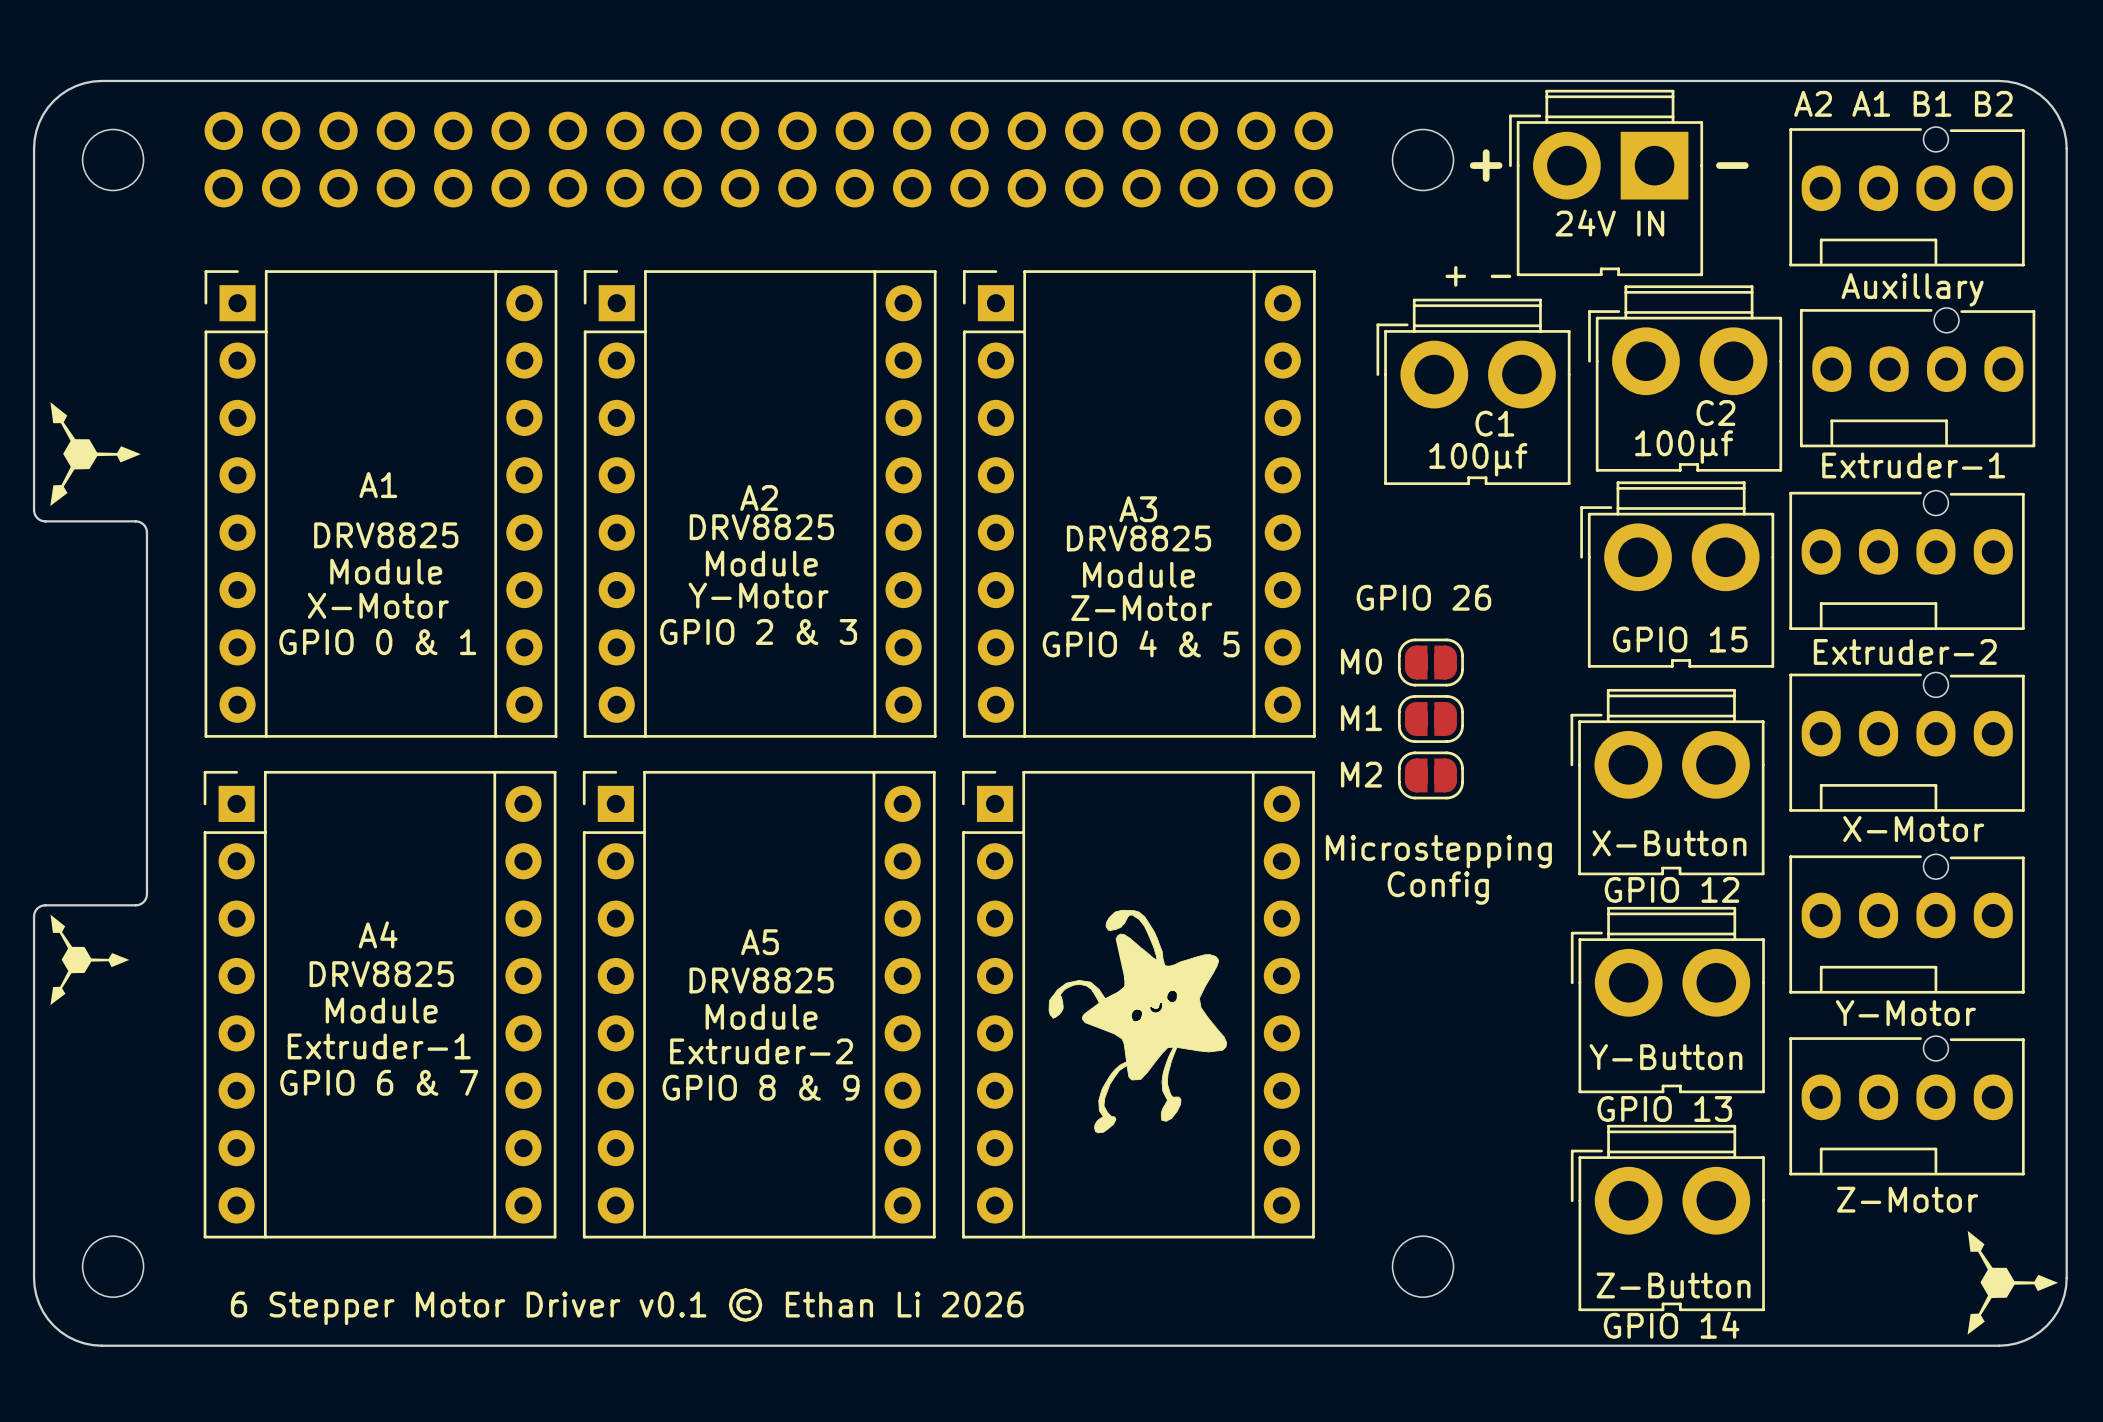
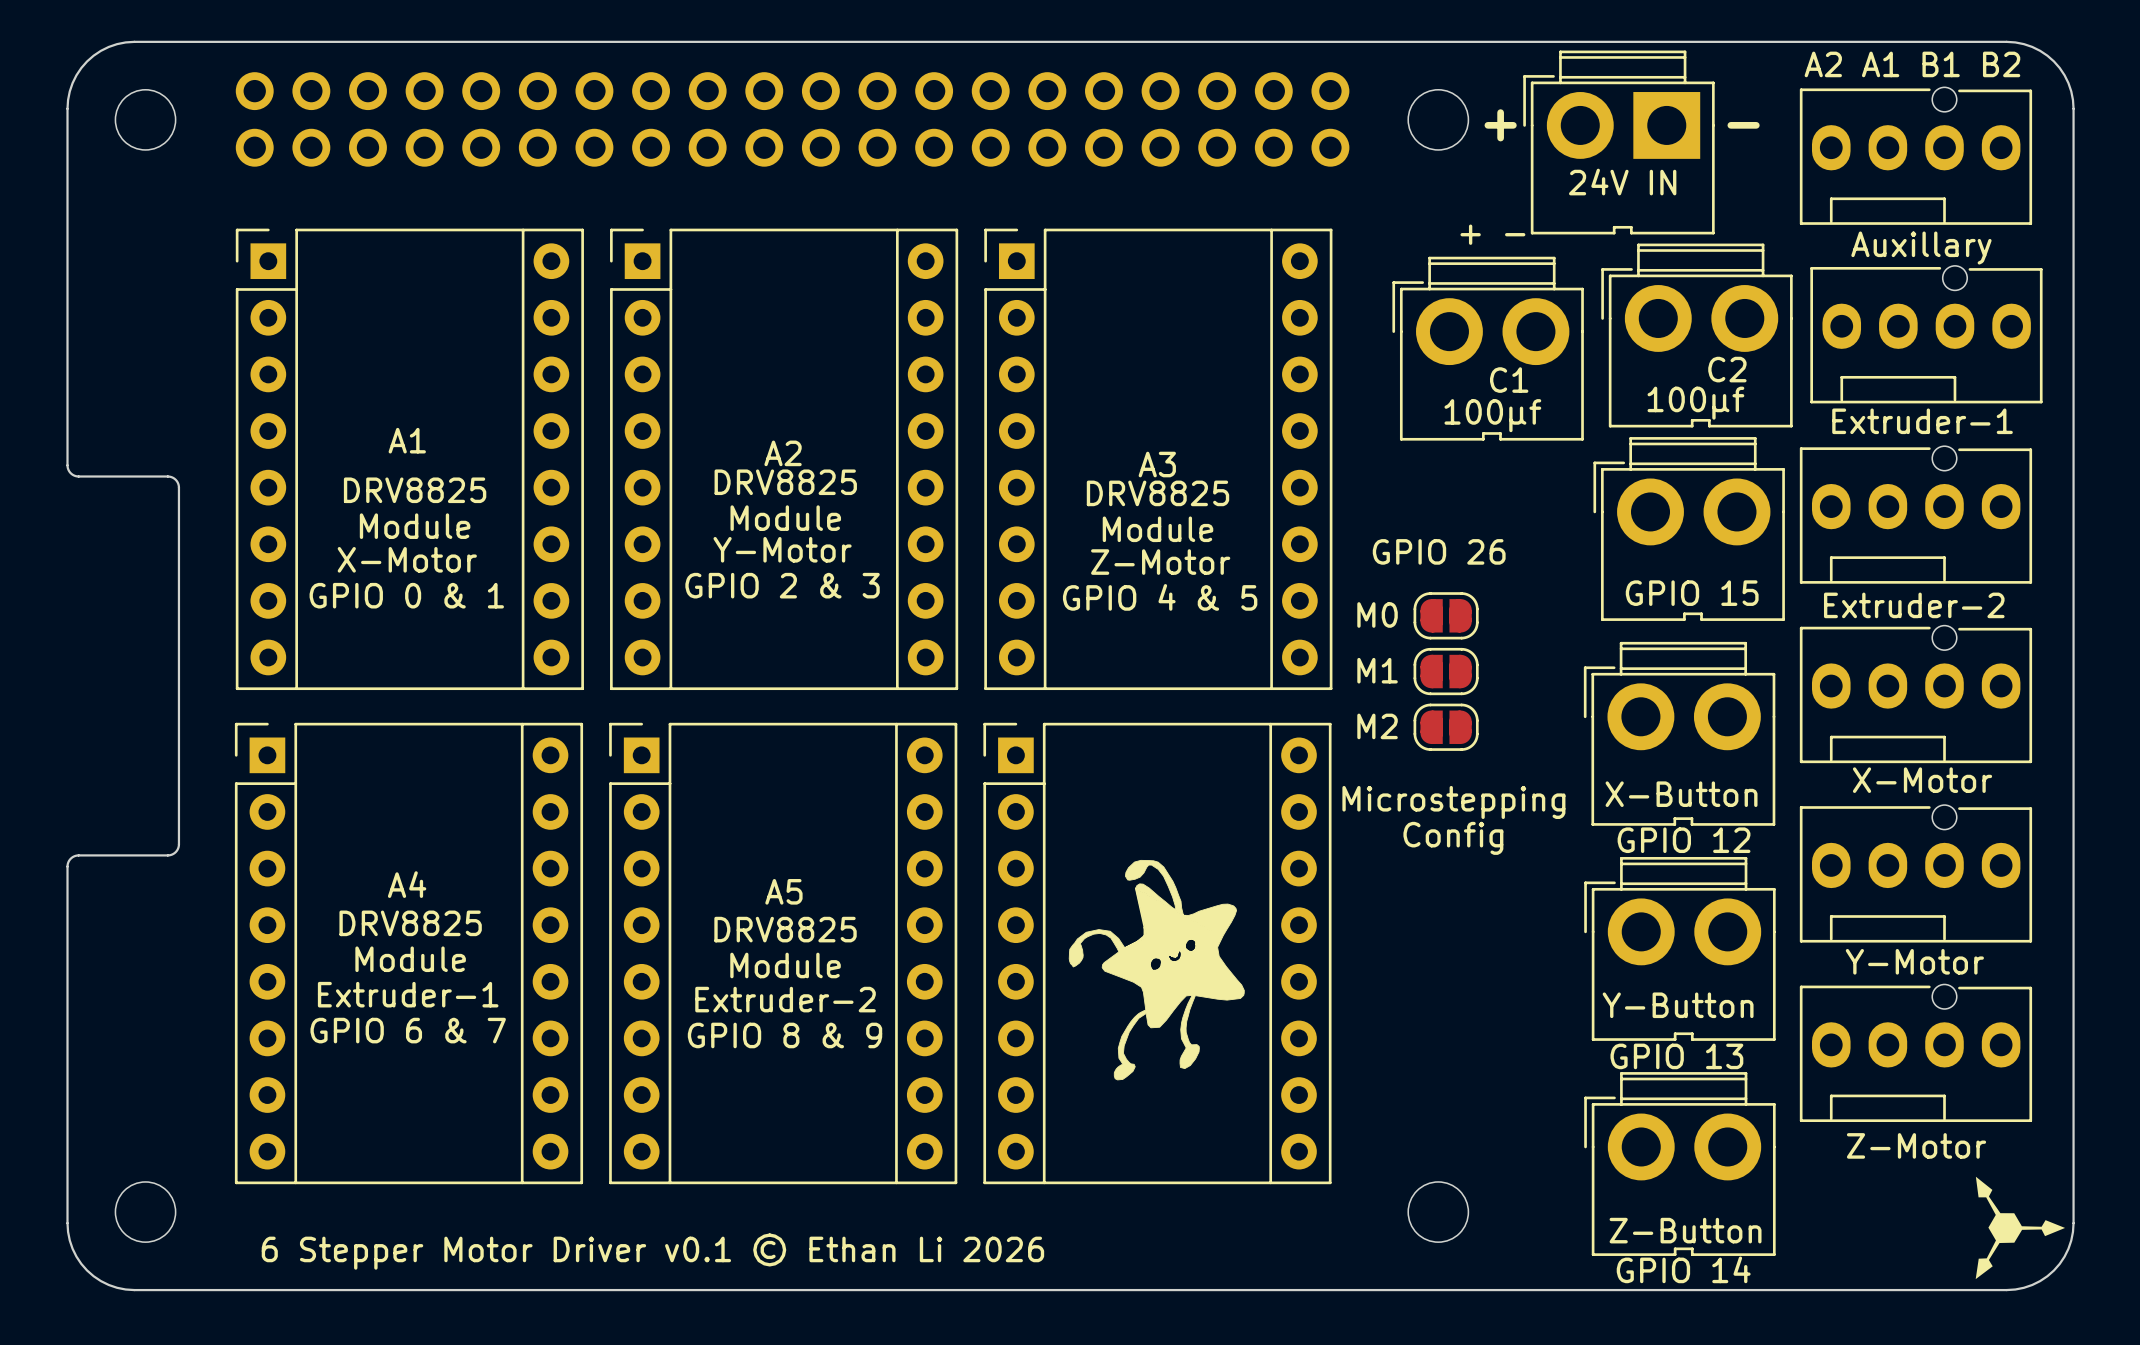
drawing: [50, 402, 141, 507] -> none
drawing: [50, 914, 130, 1006] -> none

